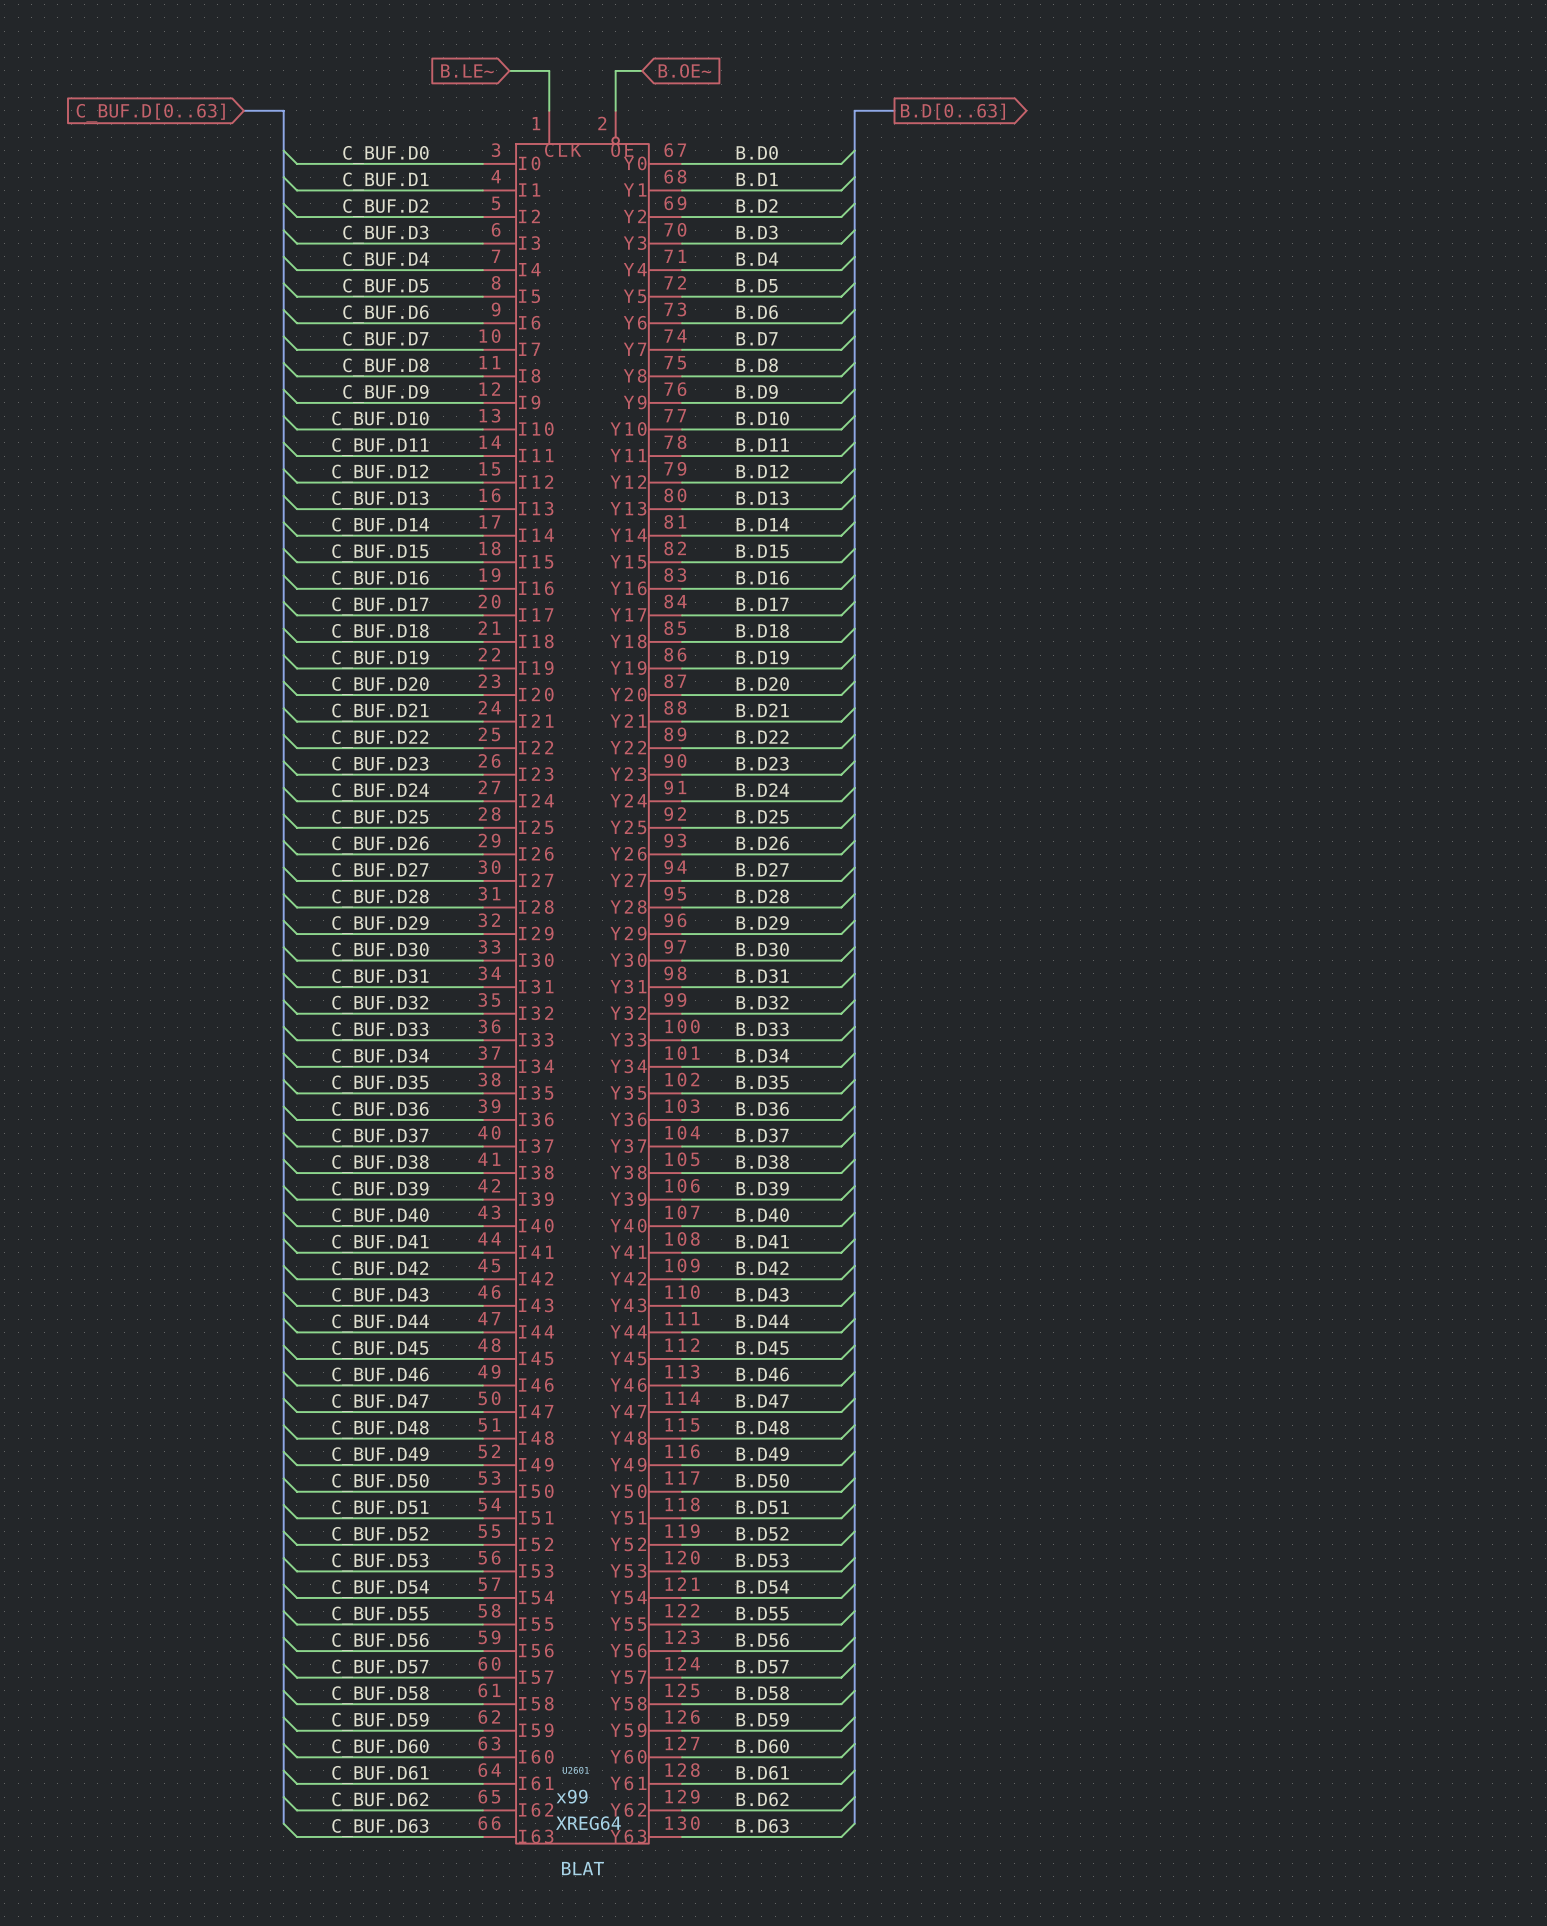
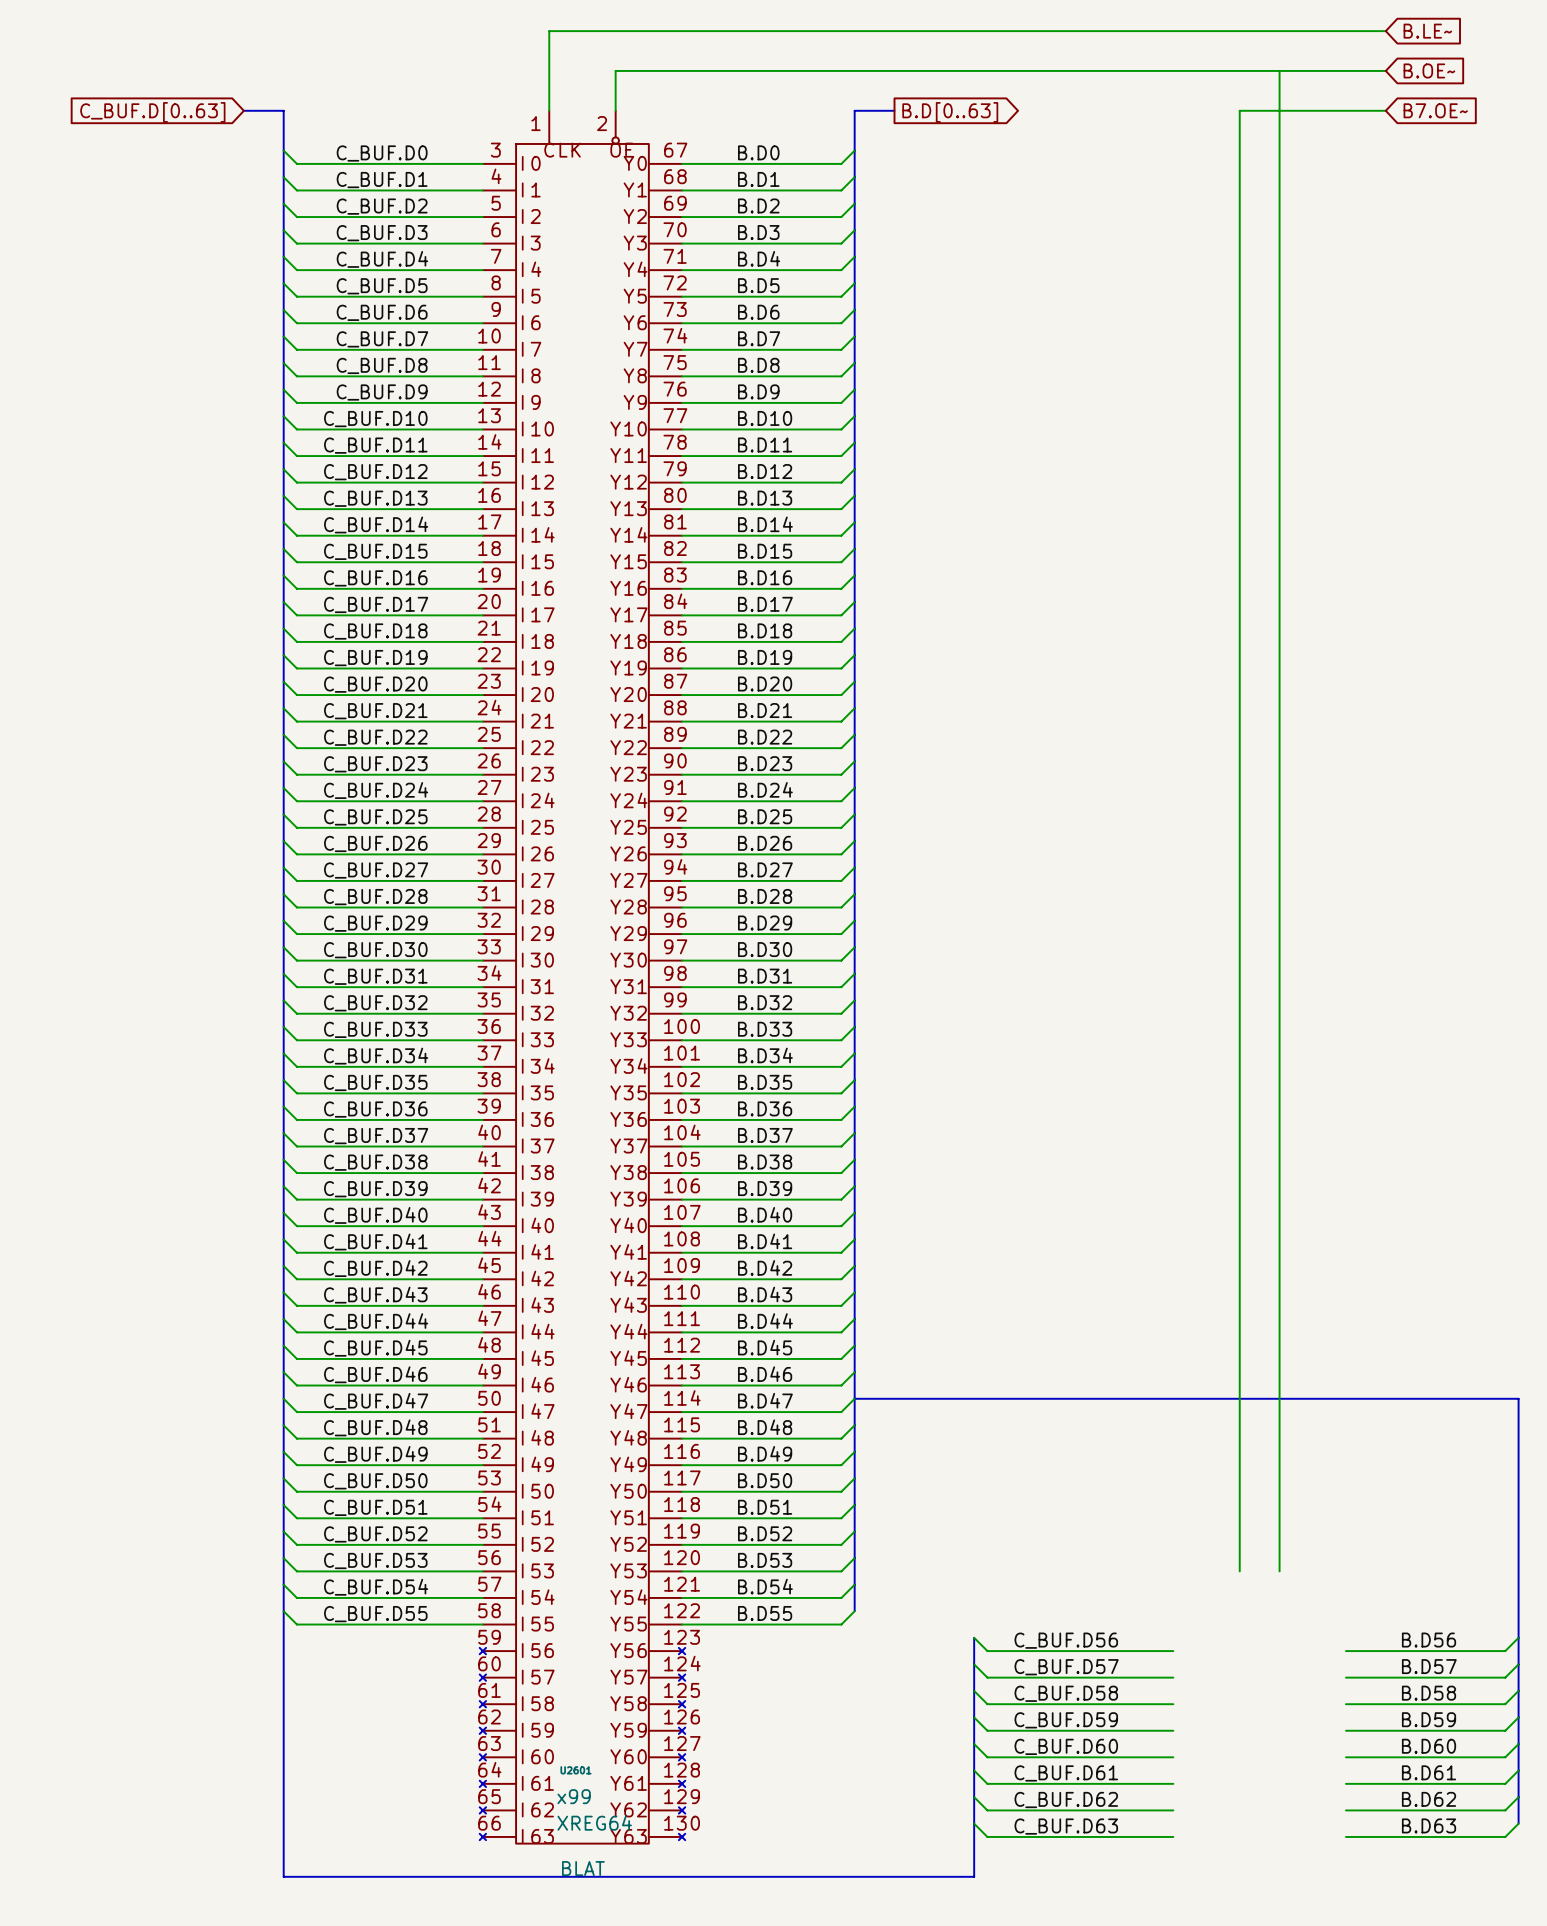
global label: none -> B.LE~ (1427, 31)
global label: B.LE~ (467, 70) -> none
wire: (509, 70) (549, 70) -> (1385, 31) (549, 31) (549, 70)
wire: none -> (642, 70) (1385, 70)
global label: B.OE~ (684, 70) -> none
wire: none -> (1279, 70) (1279, 1571)
global label: none -> B.OE~ (1429, 70)
wire: none -> (1385, 110) (1239, 110) (1239, 1571)
global label: none -> B7.OE~ (1435, 110)
bus: none -> (854, 1398) (1518, 1398) (1518, 1823)
bus: (854, 1611) (854, 1823) -> none
wire: (283, 1637) (296, 1651) (482, 1651) -> none
wire: (854, 1637) (841, 1651) (682, 1651) -> none
wire: none -> (974, 1637) (987, 1651) (1173, 1651)
bus: none -> (974, 1637) (974, 1876) (283, 1876) (283, 1823)
wire: none -> (1518, 1637) (1505, 1651) (1345, 1651)
label: B.D56 (762, 1640) -> none
label: none -> B.D56 (1429, 1640)
label: C_BUF.D56 (380, 1642) -> none
label: none -> C_BUF.D56 (1066, 1640)
no-connect mark: none -> (482, 1651)
no-connect mark: none -> (682, 1651)
wire: (283, 1664) (296, 1677) (482, 1677) -> none
wire: (854, 1664) (841, 1677) (682, 1677) -> none
wire: none -> (974, 1664) (987, 1677) (1173, 1677)
wire: none -> (1518, 1664) (1505, 1677) (1345, 1677)
label: B.D57 (762, 1666) -> none
label: none -> B.D57 (1429, 1666)
label: C_BUF.D57 (380, 1668) -> none
label: none -> C_BUF.D57 (1066, 1667)
no-connect mark: none -> (482, 1677)
no-connect mark: none -> (682, 1677)
wire: (283, 1690) (296, 1704) (482, 1704) -> none
wire: (854, 1690) (841, 1704) (682, 1704) -> none
wire: none -> (974, 1690) (987, 1704) (1173, 1704)
wire: none -> (1518, 1690) (1505, 1704) (1345, 1704)
label: B.D58 (762, 1693) -> none
label: none -> B.D58 (1429, 1693)
label: C_BUF.D58 (380, 1695) -> none
label: none -> C_BUF.D58 (1066, 1693)
no-connect mark: none -> (482, 1704)
no-connect mark: none -> (682, 1704)
wire: (283, 1717) (296, 1730) (482, 1730) -> none
wire: (854, 1717) (841, 1730) (682, 1730) -> none
wire: none -> (974, 1717) (987, 1730) (1173, 1730)
wire: none -> (1518, 1717) (1505, 1730) (1345, 1730)
label: B.D59 (762, 1719) -> none
label: none -> B.D59 (1429, 1719)
label: C_BUF.D59 (380, 1721) -> none
label: none -> C_BUF.D59 (1066, 1720)
no-connect mark: none -> (482, 1730)
no-connect mark: none -> (682, 1730)
wire: (283, 1744) (296, 1757) (482, 1757) -> none
wire: (854, 1744) (841, 1757) (682, 1757) -> none
wire: none -> (974, 1744) (987, 1757) (1173, 1757)
wire: none -> (1518, 1744) (1505, 1757) (1345, 1757)
label: B.D60 (762, 1746) -> none
label: none -> B.D60 (1429, 1746)
label: C_BUF.D60 (380, 1748) -> none
label: none -> C_BUF.D60 (1066, 1746)
no-connect mark: none -> (482, 1757)
no-connect mark: none -> (682, 1757)
wire: (283, 1770) (296, 1783) (482, 1783) -> none
wire: (854, 1770) (841, 1783) (682, 1783) -> none
wire: none -> (974, 1770) (987, 1783) (1173, 1783)
wire: none -> (1518, 1770) (1505, 1783) (1345, 1783)
label: B.D61 (762, 1772) -> none
label: none -> B.D61 (1429, 1772)
label: C_BUF.D61 (380, 1774) -> none
label: none -> C_BUF.D61 (1066, 1773)
no-connect mark: none -> (482, 1783)
no-connect mark: none -> (682, 1783)
wire: (283, 1797) (296, 1810) (482, 1810) -> none
wire: (854, 1797) (841, 1810) (682, 1810) -> none
wire: none -> (974, 1797) (987, 1810) (1173, 1810)
wire: none -> (1518, 1797) (1505, 1810) (1345, 1810)
label: B.D62 (762, 1799) -> none
label: none -> B.D62 (1429, 1799)
label: C_BUF.D62 (380, 1801) -> none
label: none -> C_BUF.D62 (1066, 1800)
no-connect mark: none -> (482, 1810)
no-connect mark: none -> (682, 1810)
wire: (283, 1823) (296, 1836) (482, 1836) -> none
wire: (854, 1823) (841, 1836) (682, 1836) -> none
wire: none -> (974, 1823) (987, 1836) (1173, 1836)
wire: none -> (1518, 1823) (1505, 1836) (1345, 1836)
label: B.D63 (762, 1825) -> none
label: none -> B.D63 (1429, 1825)
label: C_BUF.D63 (380, 1827) -> none
label: none -> C_BUF.D63 (1066, 1826)
no-connect mark: none -> (482, 1836)
no-connect mark: none -> (682, 1836)

